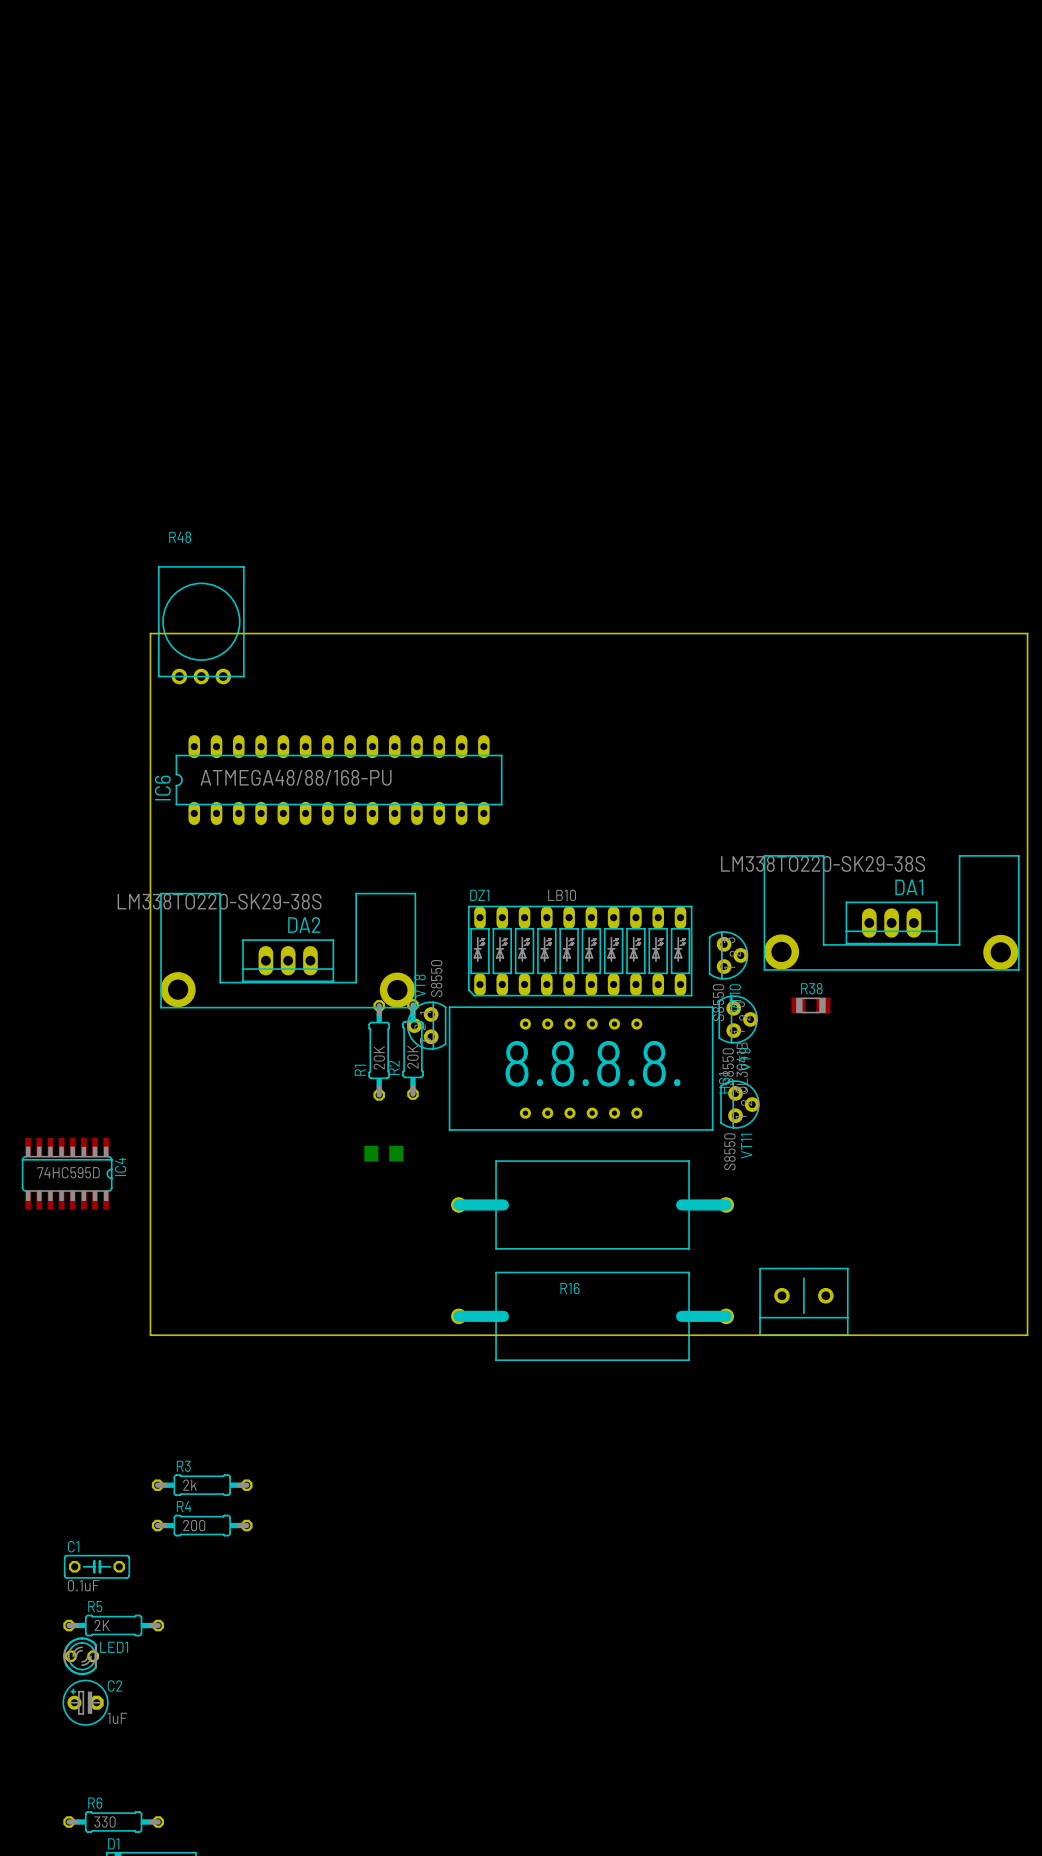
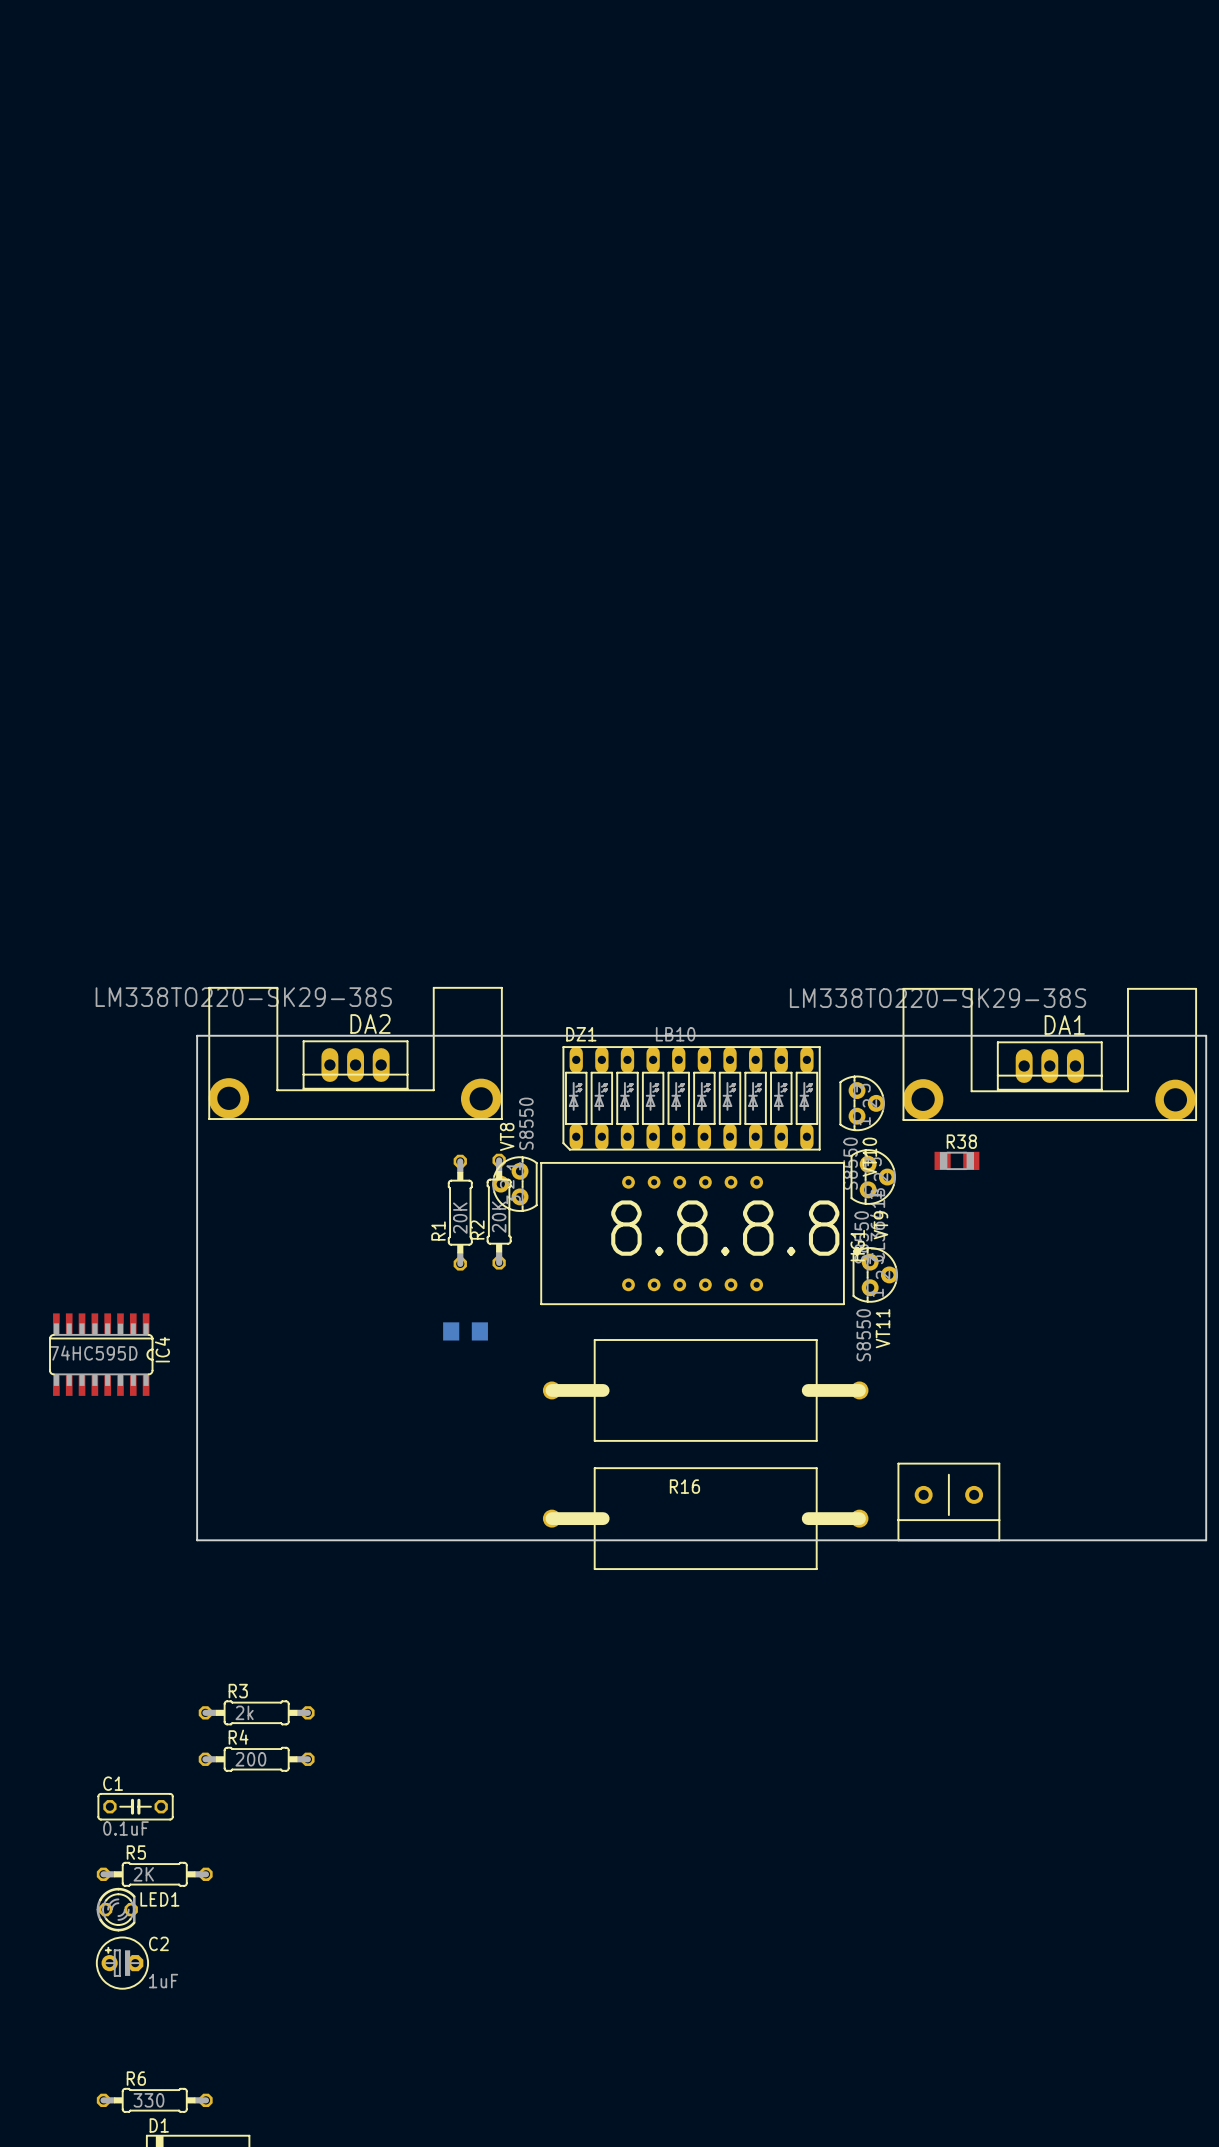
R48: (201, 625) -> none
IC6: ATMEGA48/88/168-PU (339, 780) -> none
board edge: (150, 896) (150, 633) (1027, 633) (1027, 896) -> (197, 1035) (1206, 1035)
DA2 position: (288, 950) -> (355, 1053)

